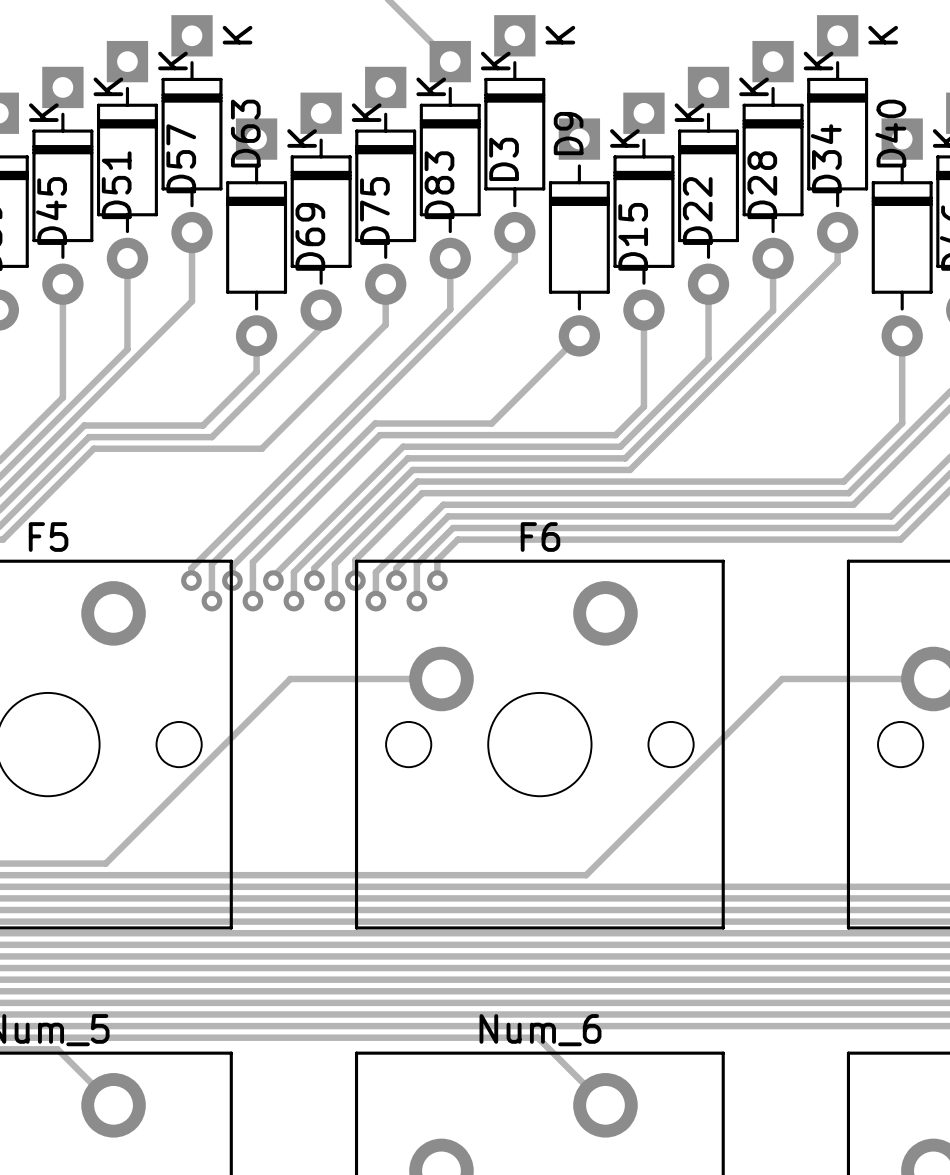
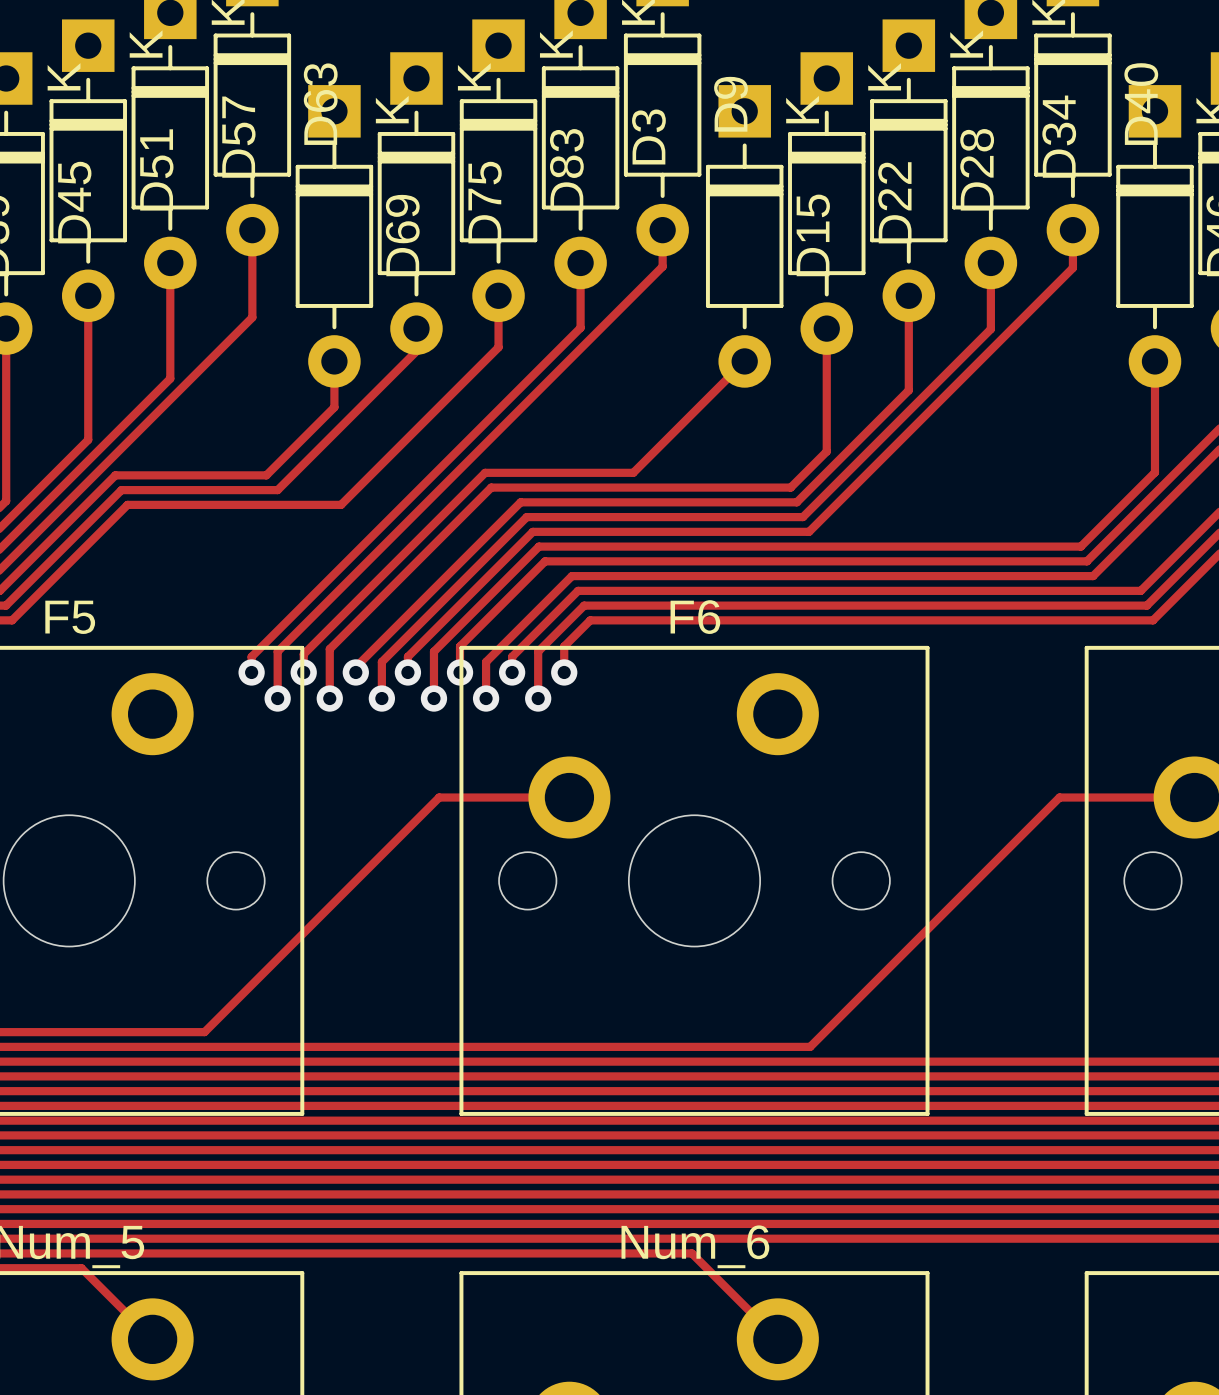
track: (339, 678) (290, 678) (105, 863) -> (439, 797) (204, 1032) (142, 1032)
track: (827, 678) (782, 678) (586, 875) -> (1059, 797) (810, 1046) (753, 1046)

